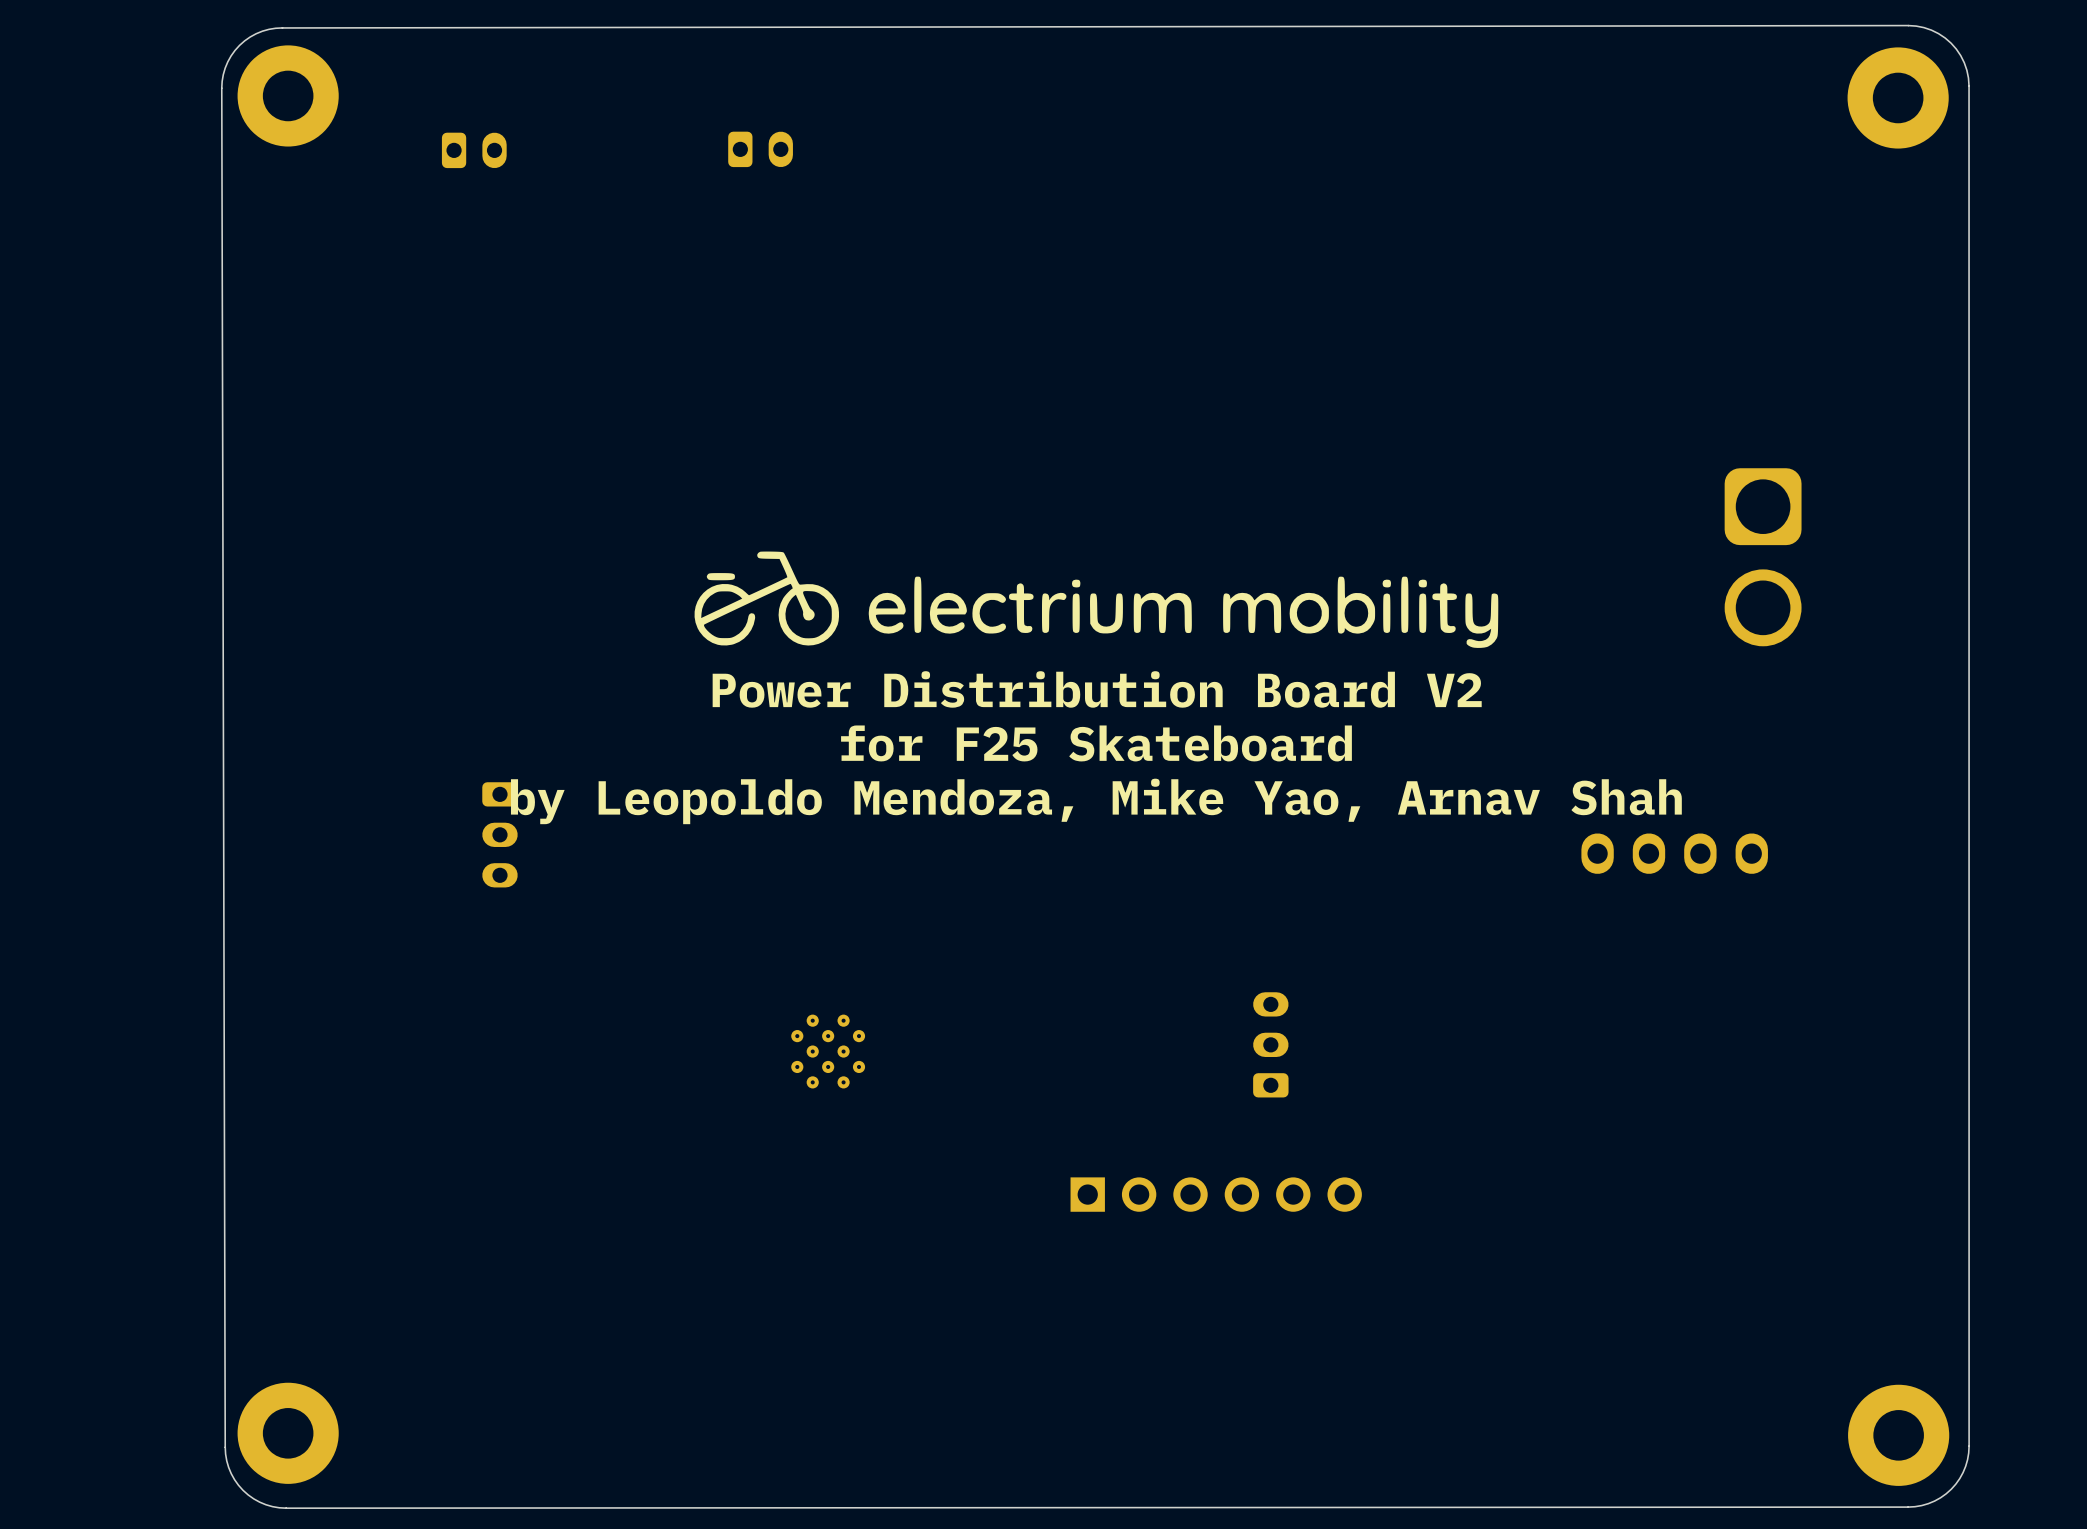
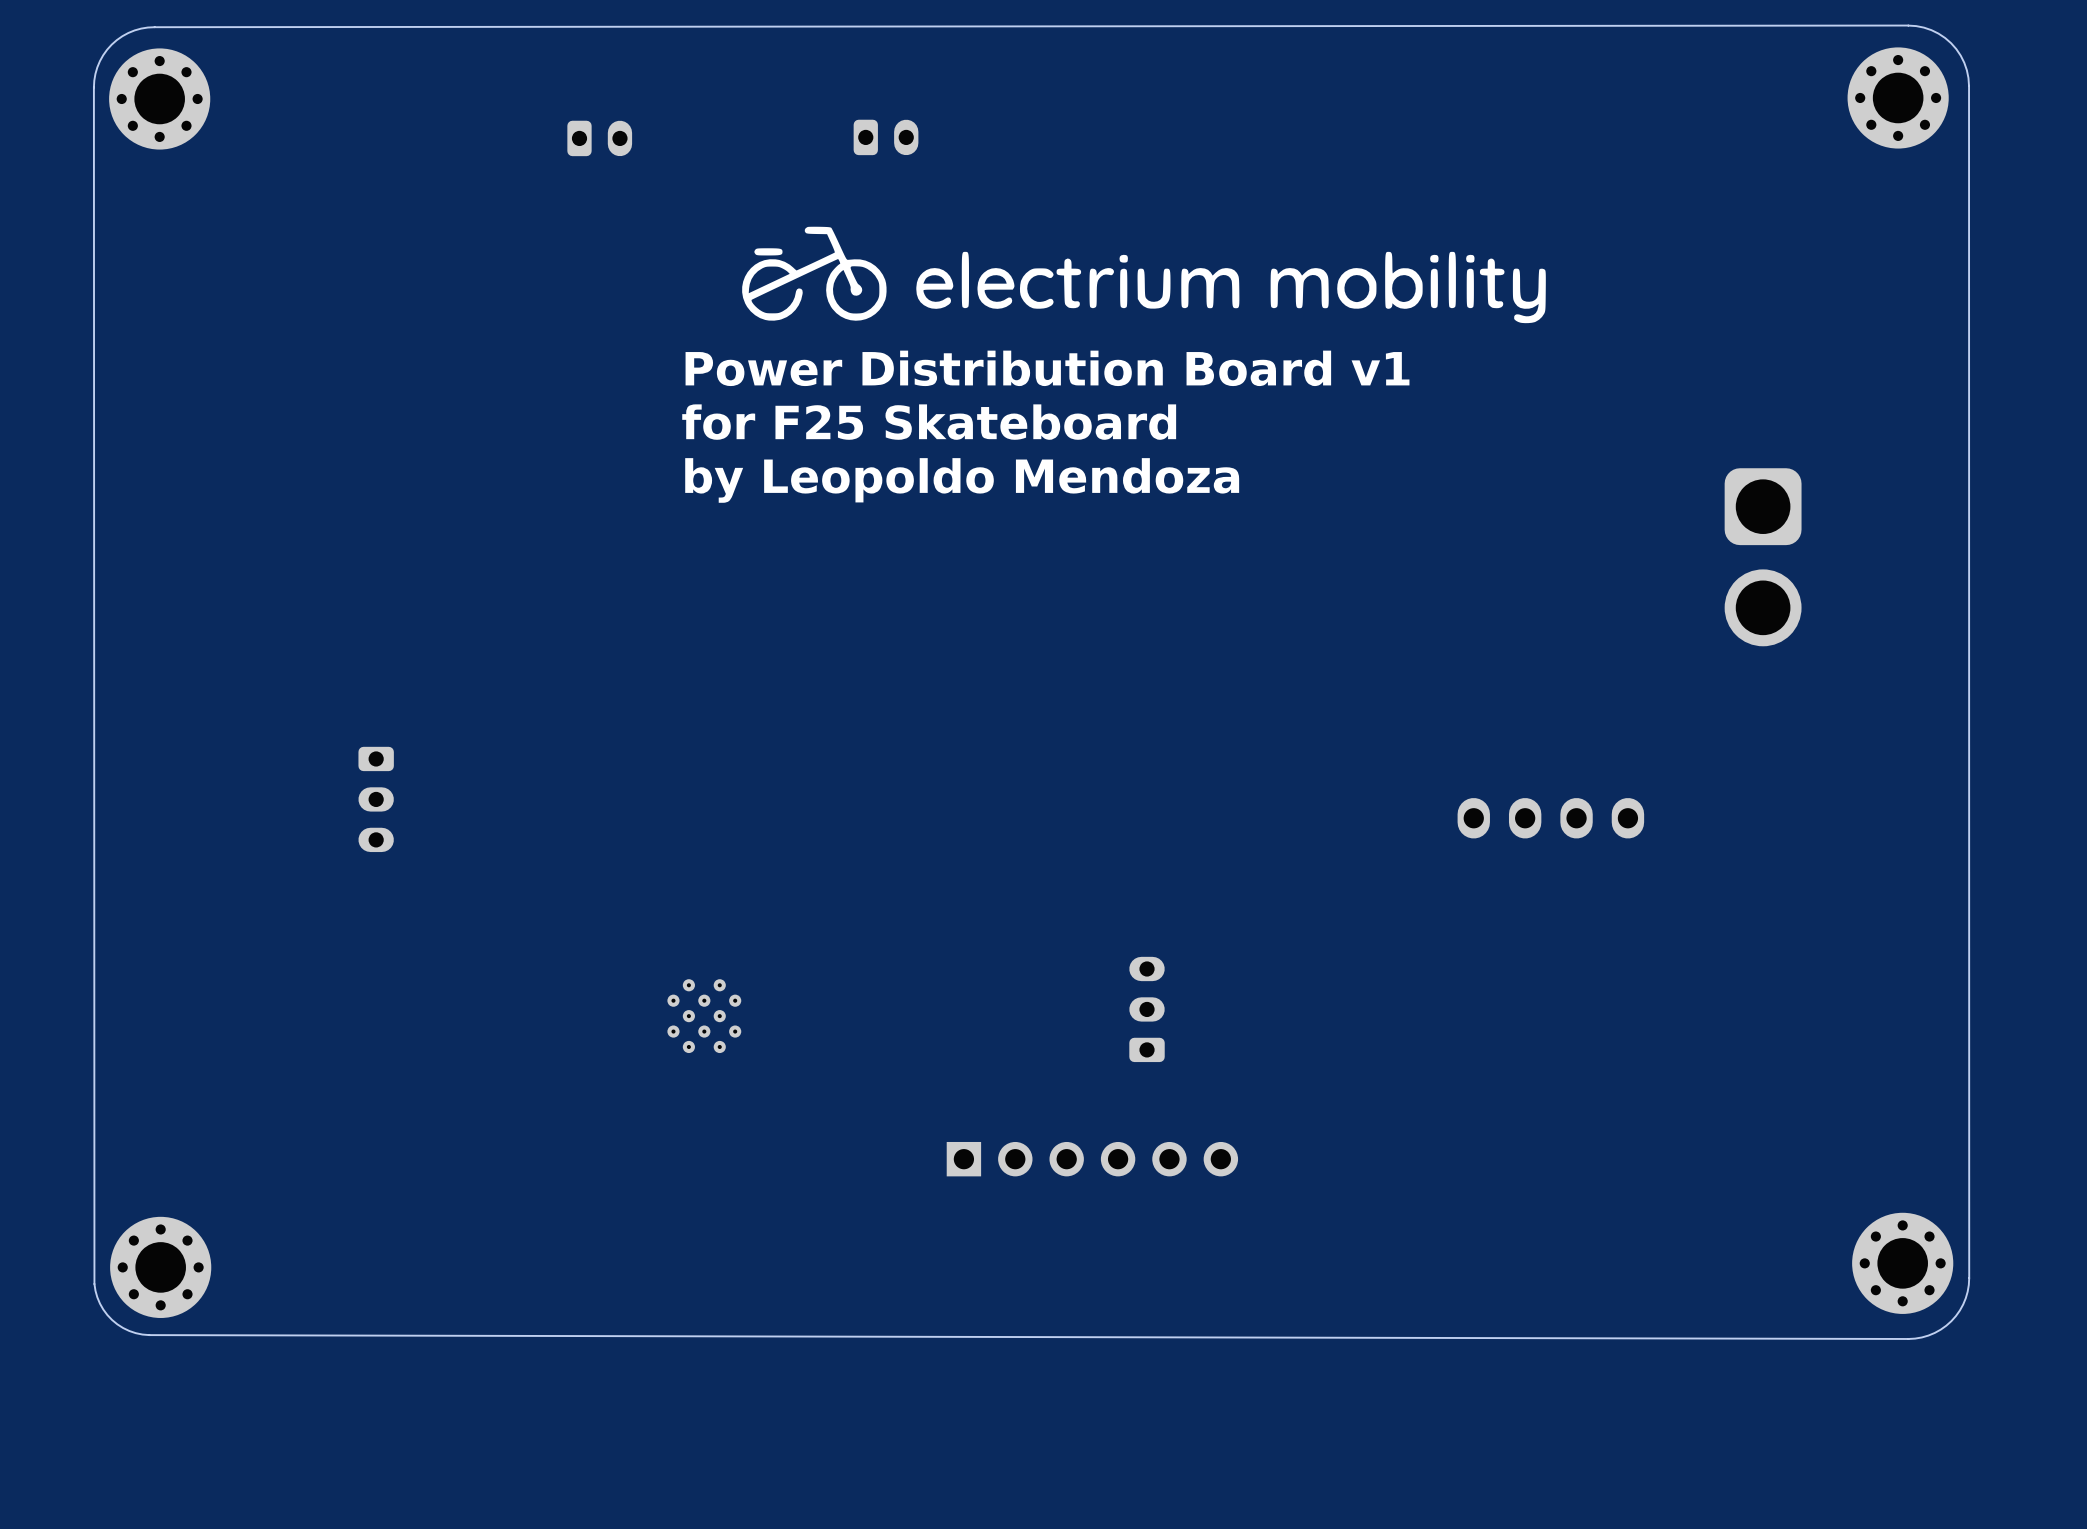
board edge: (1908, 25) (282, 27) (262, 31) (250, 36) (239, 45) (227, 61) (223, 74) (221, 88) -> (1908, 25) (154, 27) (141, 28) (128, 32) (111, 44) (103, 55) (97, 67) (93, 87)
part footprint: [1847, 47, 1949, 149] -> [1847, 47, 1949, 149]
board edge: (1969, 85) (1969, 1446) (1967, 1459) (1963, 1472) (1951, 1489) (1934, 1501) (1921, 1505) (1908, 1507) (286, 1508) (266, 1504) (248, 1494) (238, 1485) (231, 1473) (226, 1460) (225, 1447) (221, 88) -> (1969, 85) (1969, 1278) (1965, 1298) (1959, 1310) (1951, 1321) (1940, 1329) (1928, 1335) (1908, 1338) (149, 1335) (135, 1333) (117, 1324) (103, 1309) (97, 1297) (94, 1284) (93, 87)
part: (288, 95) -> none
part: none -> (159, 98)
part: none -> (886, 137)
part: none -> (599, 138)
part: (760, 149) -> none
part: (474, 150) -> none
text: none -> Power Distribution Board v1 (1047, 368)
text: none -> for F25 Skateboard (929, 422)
text: none -> by Leopoldo Mendoza (962, 480)
drawing position: (1096, 599) -> (1143, 274)
text: Power Distribution Board V2 (1097, 689) -> none
text: for F25 Skateboard (1096, 743) -> none
text: by Leopoldo Mendoza, Mike Yao, Arnav Shah (1096, 801) -> none
part position: (499, 834) -> (376, 799)
part position: (1674, 853) -> (1550, 818)
part position: (1270, 1044) -> (1147, 1009)
part position: (828, 1051) -> (704, 1016)
part position: (1216, 1194) -> (1092, 1159)
part: none -> (1902, 1263)
part: none -> (160, 1267)
part: (288, 1433) -> none
part: (1898, 1435) -> none

